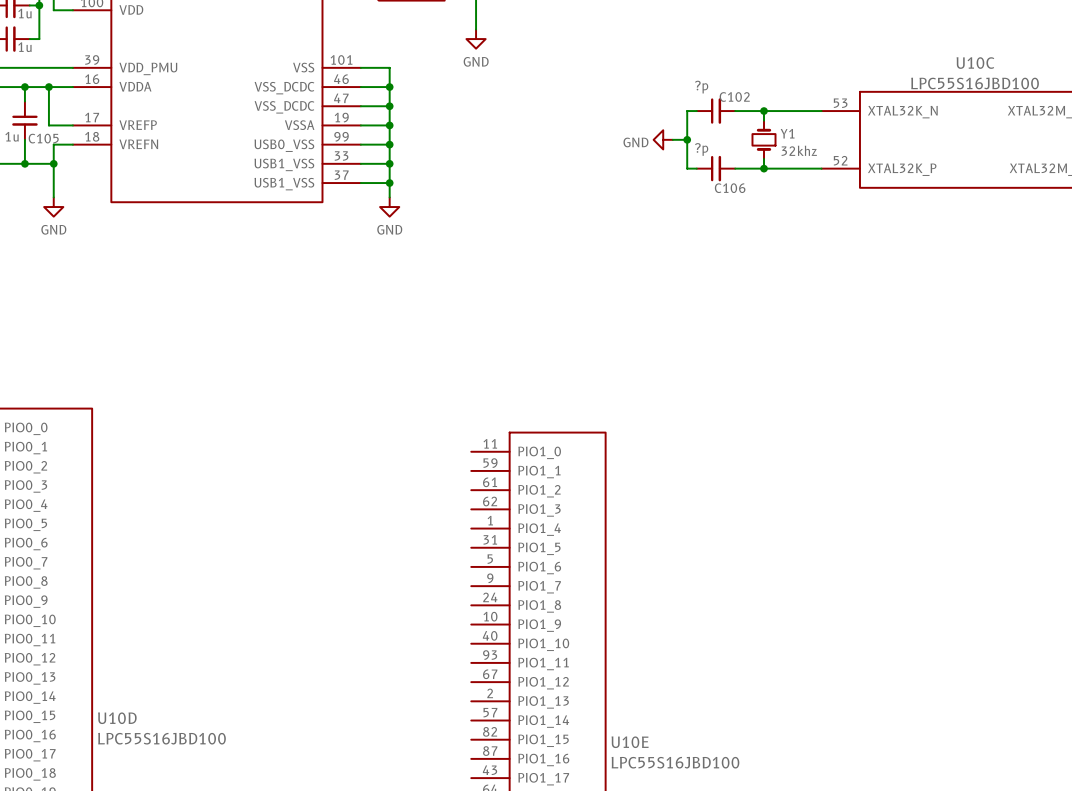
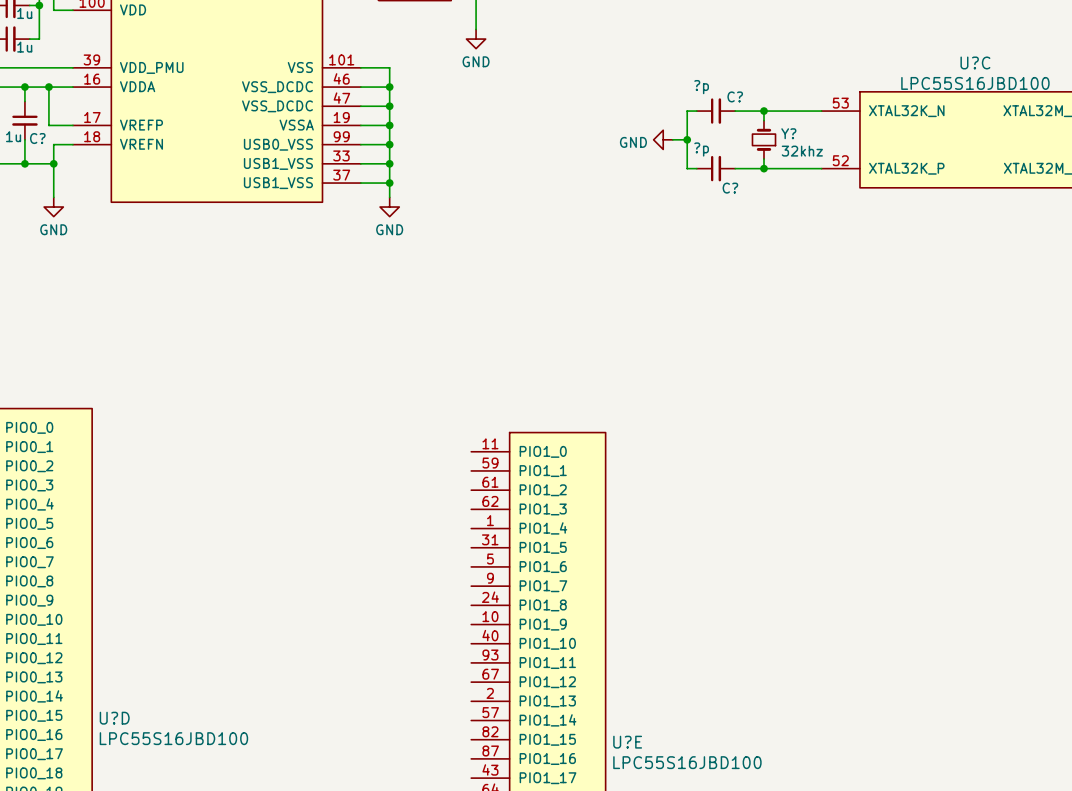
U10C name: U10C (975, 63) -> U?C (975, 62)
C102 name: C102 (734, 96) -> C? (735, 96)
Y1 name: Y1 (787, 133) -> Y? (788, 133)
C105 name: C105 (43, 138) -> C? (37, 138)
C106 name: C106 (730, 188) -> C? (730, 188)
U10D name: U10D (117, 718) -> U?D (114, 718)
U10E name: U10E (630, 742) -> U?E (627, 742)

